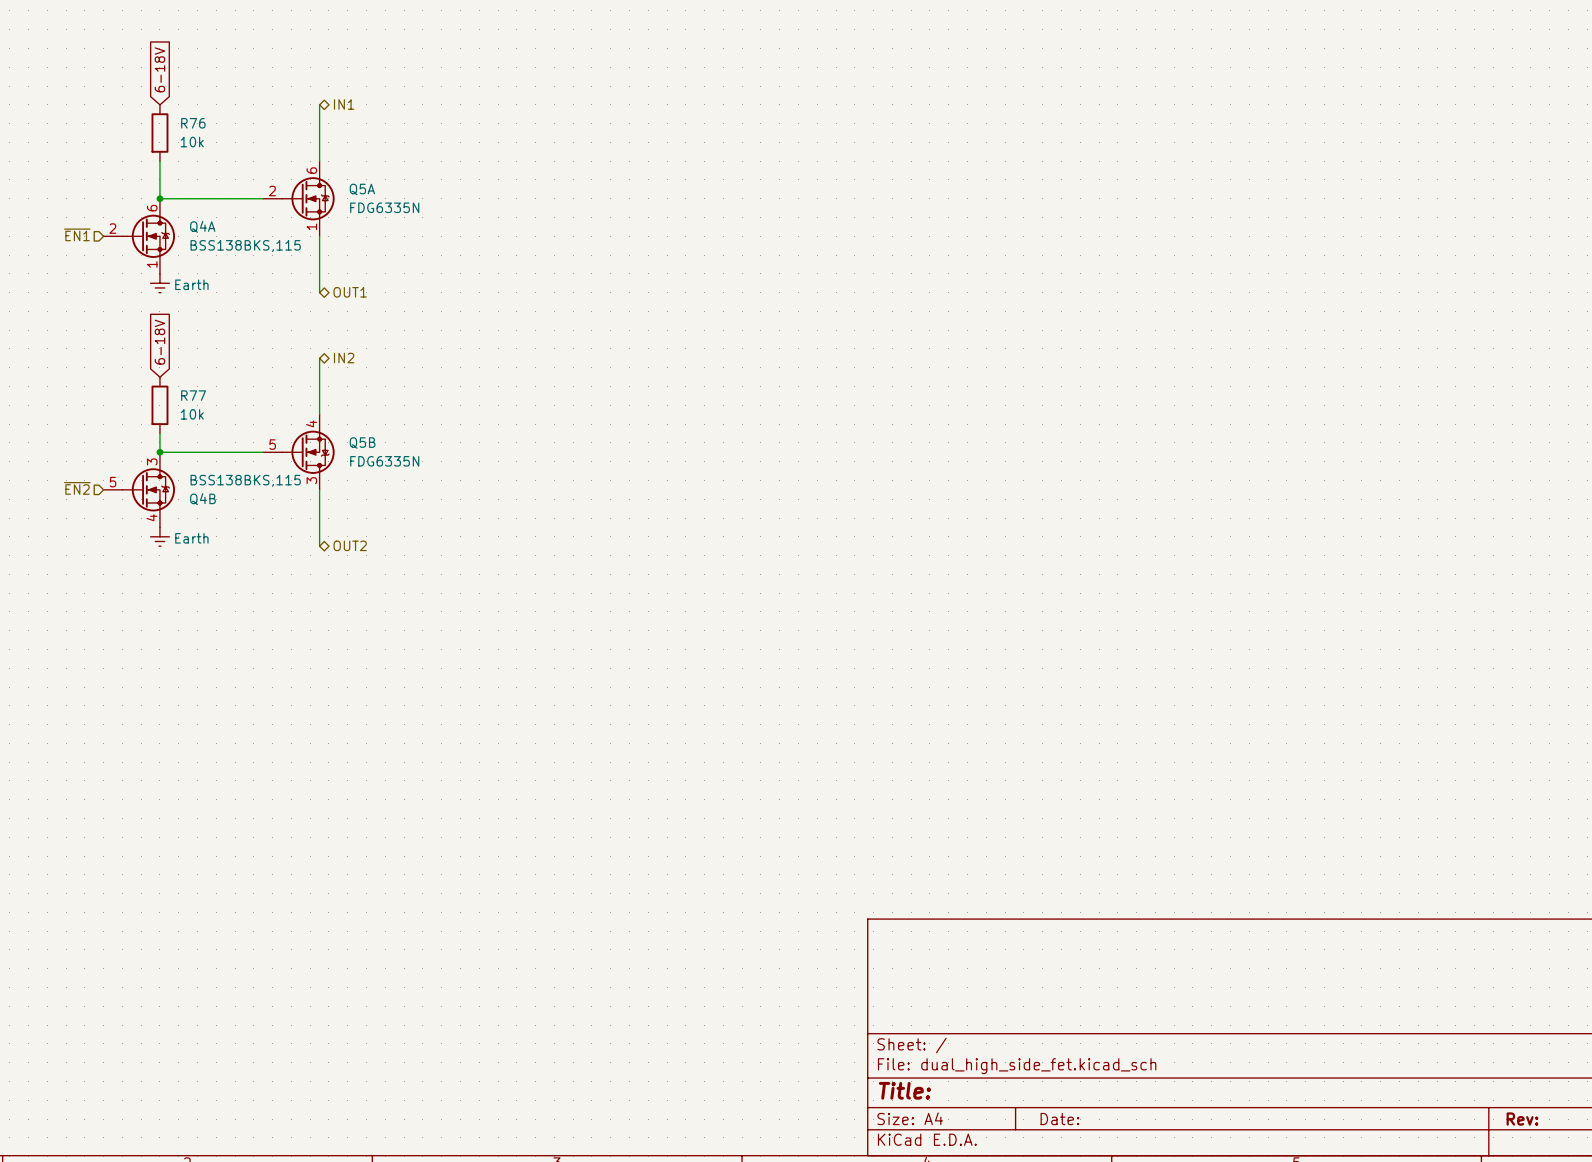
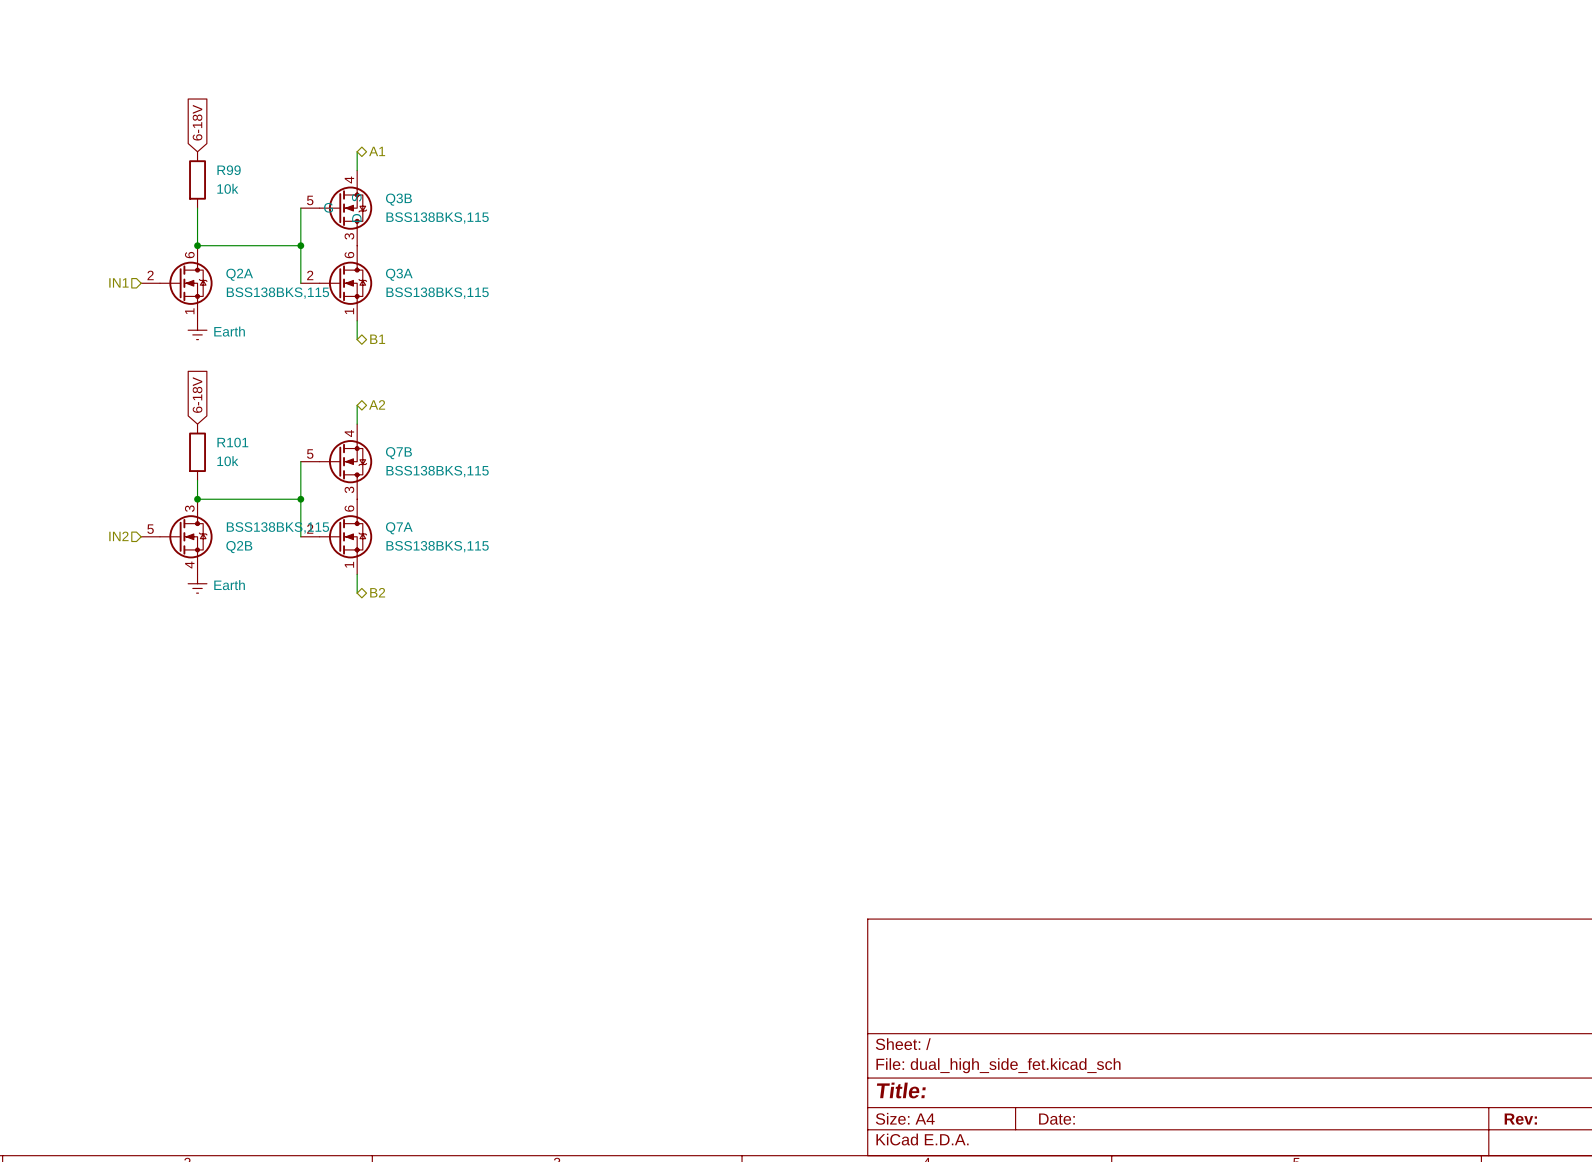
global label position: 6-18V (159, 69) -> 6-18V (197, 122)
wire: (319, 104) (319, 161) -> none
hierarchical label: IN1 (344, 104) -> none
R76: 10k (159, 133) -> none
wire: none -> (357, 151) (357, 170)
hierarchical label: none -> A1 (377, 151)
wire: (159, 161) (159, 198) (263, 198) -> (197, 208) (197, 245) (300, 245)
R99: none -> 10k (197, 179)
junction: (159, 198) -> none
Q5A: FDG6335N (298, 198) -> none
wire: none -> (300, 208) (300, 283)
Q3B: none -> BSS138BKS,115 (336, 208)
hierarchical label: ~{EN1} (77, 234) -> none
Q4A: BSS138BKS,115 (139, 236) -> none
wire: (319, 236) (319, 292) -> none
junction: none -> (197, 245)
junction: none -> (300, 245)
hierarchical label: none -> IN1 (118, 282)
power symbol position: Earth (159, 283) -> Earth (197, 330)
Q2A: none -> BSS138BKS,115 (176, 283)
Q3A: none -> BSS138BKS,115 (336, 283)
hierarchical label: OUT1 (350, 292) -> none
wire: none -> (357, 320) (357, 339)
hierarchical label: none -> B1 (377, 339)
global label position: 6-18V (159, 342) -> 6-18V (197, 395)
wire: (319, 358) (319, 414) -> none
hierarchical label: IN2 (344, 358) -> none
hierarchical label: none -> A2 (377, 404)
R77: 10k (159, 405) -> none
wire: none -> (357, 405) (357, 424)
wire: (159, 433) (159, 452) (263, 452) -> (197, 480) (197, 499) (300, 499)
junction: (159, 452) -> none
R101: none -> 10k (197, 452)
Q5B: FDG6335N (298, 452) -> none
wire: none -> (300, 461) (300, 536)
Q7B: none -> BSS138BKS,115 (336, 461)
hierarchical label: ~{EN2} (77, 488) -> none
Q4B: BSS138BKS,115 (139, 489) -> none
wire: (319, 489) (319, 546) -> none
junction: none -> (197, 499)
junction: none -> (300, 499)
hierarchical label: none -> IN2 (118, 536)
power symbol position: Earth (159, 536) -> Earth (197, 583)
Q2B: none -> BSS138BKS,115 (176, 536)
Q7A: none -> BSS138BKS,115 (336, 536)
hierarchical label: OUT2 (350, 545) -> none
wire: none -> (357, 574) (357, 593)
hierarchical label: none -> B2 (377, 592)

